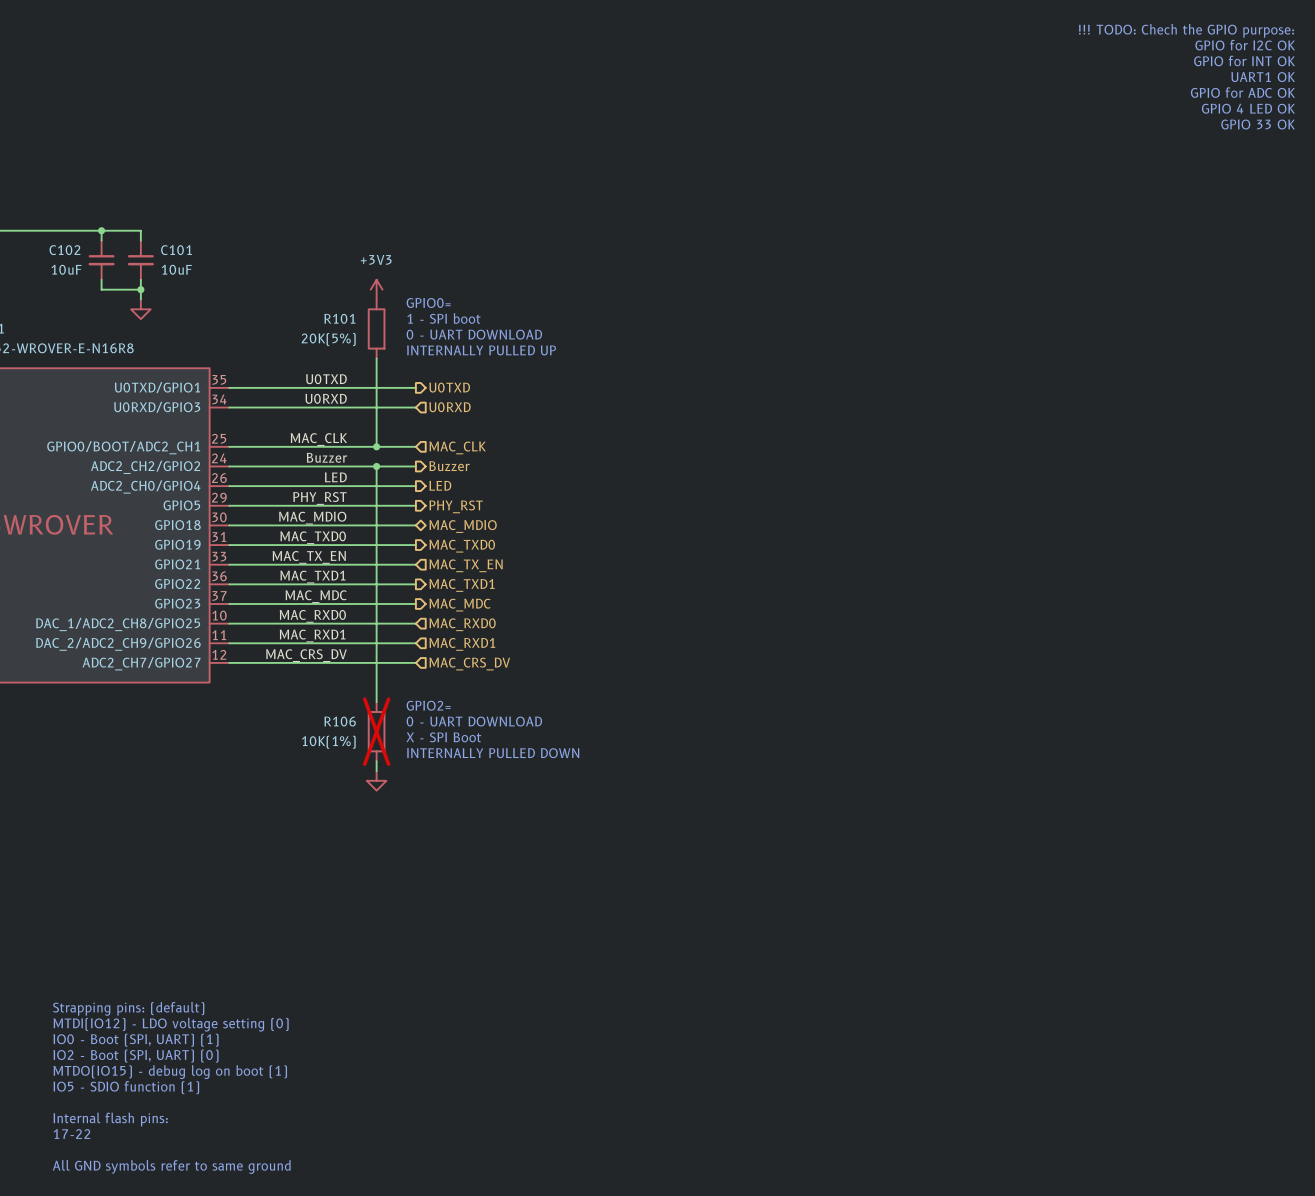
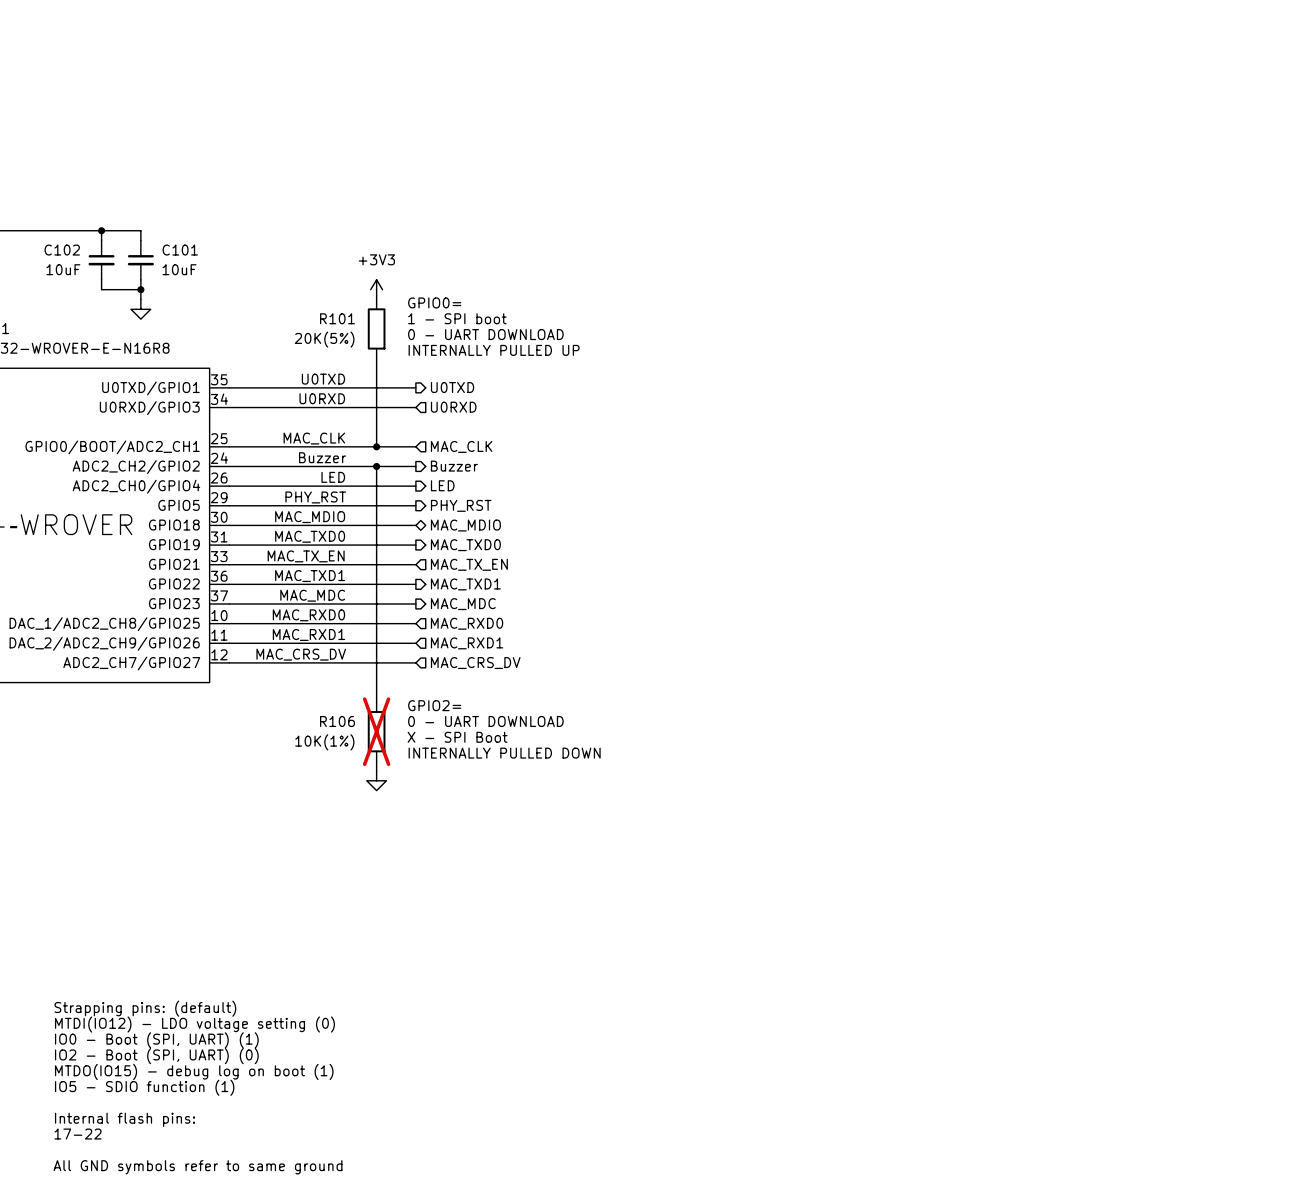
text: !!! TODO: Chech the GPIO purpose: (1186, 30) -> none
text: GPIO for I2C OK (1245, 45) -> none
text: GPIO for INT OK (1244, 60) -> none
text: UART1 OK (1263, 77) -> none
text: GPIO for ADC OK (1242, 92) -> none
text: GPIO 4 LED OK (1248, 108) -> none
text: GPIO 33 OK (1258, 124) -> none

